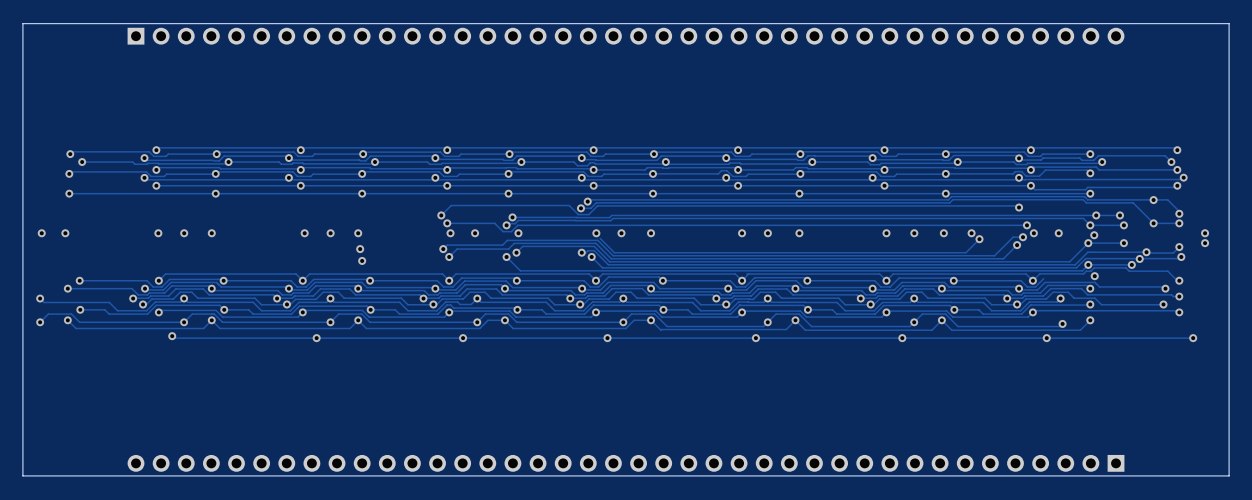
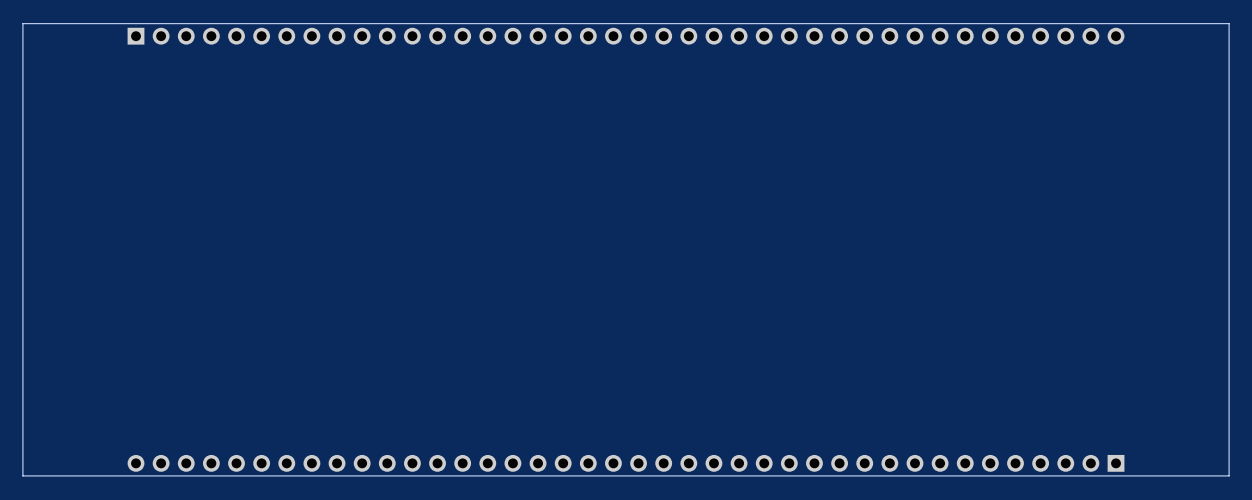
via: (156, 150) -> none
via: (300, 150) -> none
via: (447, 150) -> none
via: (593, 150) -> none
via: (738, 150) -> none
via: (884, 150) -> none
via: (1030, 150) -> none
track: (1177, 150) (1175, 147) (1033, 147) (1030, 150) (1028, 147) (886, 147) (884, 150) (882, 147) (740, 147) (738, 150) (735, 147) (595, 147) (593, 150) (591, 147) (449, 147) (447, 150) (444, 147) (303, 147) (300, 150) (298, 147) (158, 147) (156, 150) -> none
via: (1177, 150) -> none
track: (219, 152) (293, 152) (298, 156) (312, 156) (314, 154) (362, 154) -> none
track: (366, 152) (440, 152) (444, 156) (458, 156) (461, 154) (508, 154) -> none
track: (510, 152) (586, 152) (591, 156) (603, 156) (605, 154) (653, 154) -> none
track: (656, 152) (731, 152) (735, 156) (749, 156) (751, 154) (799, 154) -> none
via: (70, 154) -> none
track: (215, 154) (168, 154) (165, 156) (153, 156) (149, 151) (72, 151) (70, 154) -> none
via: (216, 154) -> none
via: (363, 154) -> none
via: (509, 154) -> none
via: (653, 154) -> none
via: (800, 154) -> none
via: (945, 154) -> none
track: (1090, 154) (1042, 154) (1040, 156) (1028, 156) (1024, 152) (947, 152) (945, 154) (898, 154) (896, 156) (881, 156) (877, 151) (802, 151) (800, 154) -> none
via: (1090, 154) -> none
track: (286, 156) (224, 156) (219, 160) (213, 160) -> none
track: (432, 156) (370, 156) (365, 160) (360, 160) -> none
track: (579, 156) (516, 156) (512, 160) (435, 158) -> none
track: (723, 156) (661, 156) (657, 160) (596, 160) (581, 158) -> none
track: (870, 156) (808, 155) (803, 160) (726, 158) -> none
via: (144, 158) -> none
via: (288, 158) -> none
via: (435, 158) -> none
via: (581, 158) -> none
via: (726, 158) -> none
via: (872, 158) -> none
track: (1019, 158) (1016, 155) (953, 155) (948, 160) (874, 159) -> none
via: (1019, 158) -> none
track: (522, 159) (524, 162) (573, 162) (577, 165) (587, 165) (590, 162) (811, 163) -> none
track: (213, 160) (145, 160) -> none
track: (359, 160) (291, 160) -> none
track: (1021, 160) (1079, 158) (1082, 160) (1093, 160) (1098, 155) (1165, 155) (1171, 162) -> none
track: (814, 161) (867, 162) (870, 164) (957, 162) (1013, 162) (1016, 164) (1102, 162) -> none
via: (82, 162) -> none
via: (228, 162) -> none
via: (375, 162) -> none
track: (521, 162) (441, 164) (429, 164) (427, 162) (291, 164) (281, 164) (279, 162) (147, 164) (134, 164) (132, 162) (82, 162) -> none
via: (521, 162) -> none
via: (665, 162) -> none
via: (812, 162) -> none
via: (957, 162) -> none
via: (1102, 162) -> none
via: (1171, 162) -> none
track: (447, 168) (303, 167) (300, 169) (158, 167) (156, 169) -> none
track: (593, 168) (449, 167) (447, 169) -> none
track: (738, 168) (647, 167) (645, 169) (593, 169) -> none
track: (884, 168) (795, 167) (793, 169) (738, 169) -> none
via: (156, 169) -> none
via: (300, 169) -> none
via: (447, 169) -> none
via: (593, 169) -> none
via: (738, 169) -> none
via: (884, 169) -> none
via: (1030, 169) -> none
track: (1175, 169) (1099, 169) (1096, 167) (1033, 167) (1030, 169) (1029, 168) (886, 167) (884, 169) -> none
via: (1177, 169) -> none
track: (72, 171) (146, 171) (151, 176) (164, 176) (166, 174) (214, 174) -> none
track: (219, 171) (292, 171) (297, 176) (310, 176) (313, 174) (361, 174) -> none
track: (365, 171) (439, 171) (443, 176) (457, 176) (459, 174) (507, 174) -> none
track: (510, 171) (583, 171) (588, 176) (601, 176) (603, 174) (651, 174) -> none
track: (803, 171) (876, 171) (881, 176) (894, 176) (896, 174) (944, 174) -> none
via: (69, 173) -> none
via: (215, 173) -> none
via: (362, 173) -> none
via: (508, 173) -> none
track: (653, 173) (718, 173) (721, 170) (726, 170) (732, 176) (746, 176) (748, 174) (796, 174) -> none
via: (653, 173) -> none
via: (800, 173) -> none
via: (945, 173) -> none
track: (1090, 173) (1087, 170) (1045, 170) (1039, 176) (1026, 176) (1021, 171) (1015, 171) (1013, 173) (945, 173) -> none
via: (1090, 173) -> none
via: (144, 177) -> none
track: (288, 177) (286, 179) (145, 179) -> none
via: (288, 177) -> none
track: (435, 177) (433, 179) (292, 179) -> none
via: (435, 177) -> none
track: (581, 177) (579, 179) (438, 179) -> none
via: (581, 177) -> none
track: (726, 177) (724, 179) (583, 179) -> none
via: (726, 177) -> none
track: (872, 177) (870, 179) (729, 179) -> none
via: (872, 177) -> none
via: (1019, 177) -> none
track: (1183, 177) (1181, 179) (1021, 179) (1019, 177) (1017, 179) (876, 179) -> none
via: (1183, 177) -> none
via: (156, 185) -> none
via: (300, 185) -> none
via: (447, 185) -> none
via: (593, 185) -> none
via: (738, 185) -> none
via: (884, 185) -> none
via: (1030, 185) -> none
track: (1175, 185) (1173, 187) (1087, 187) (1085, 189) (1034, 189) (1030, 185) (156, 185) -> none
via: (1177, 185) -> none
via: (69, 193) -> none
via: (215, 193) -> none
via: (362, 193) -> none
via: (508, 193) -> none
via: (653, 193) -> none
via: (799, 193) -> none
via: (945, 193) -> none
track: (1090, 193) (69, 193) -> none
via: (1090, 193) -> none
via: (1153, 200) -> none
track: (587, 201) (589, 199) (948, 199) (951, 196) (1084, 196) (1087, 199) (1167, 199) (1179, 213) -> none
via: (587, 201) -> none
track: (1019, 207) (1017, 205) (597, 205) (588, 214) (578, 214) (569, 205) (451, 205) (441, 215) -> none
via: (1019, 207) -> none
track: (580, 208) (590, 208) (596, 202) (949, 202) (952, 199) (1083, 199) (1086, 202) (1133, 202) (1153, 223) (1179, 223) -> none
via: (580, 208) -> none
via: (1179, 213) -> none
via: (441, 215) -> none
via: (1096, 215) -> none
track: (1119, 215) (611, 215) (609, 217) (512, 217) -> none
via: (1119, 215) -> none
via: (512, 217) -> none
track: (447, 223) (494, 223) (502, 231) (511, 231) (517, 225) (1026, 225) -> none
via: (447, 223) -> none
via: (1153, 223) -> none
via: (1179, 223) -> none
via: (506, 225) -> none
via: (1026, 225) -> none
via: (1090, 225) -> none
track: (1123, 225) (1090, 225) (1083, 218) (613, 218) (610, 220) (518, 220) (515, 223) (509, 222) (506, 225) -> none
via: (1123, 225) -> none
via: (41, 233) -> none
via: (65, 233) -> none
via: (158, 233) -> none
via: (184, 233) -> none
via: (211, 233) -> none
via: (304, 233) -> none
via: (330, 233) -> none
via: (358, 233) -> none
via: (450, 233) -> none
via: (475, 233) -> none
via: (518, 233) -> none
via: (596, 233) -> none
via: (621, 233) -> none
via: (651, 233) -> none
via: (742, 233) -> none
via: (767, 233) -> none
via: (799, 233) -> none
via: (886, 233) -> none
via: (914, 233) -> none
via: (943, 233) -> none
via: (971, 233) -> none
via: (1033, 233) -> none
via: (1058, 233) -> none
via: (1205, 233) -> none
via: (1094, 235) -> none
track: (1023, 237) (1013, 237) (994, 255) (613, 255) (597, 240) (507, 240) (502, 245) (447, 245) (443, 249) -> none
via: (1023, 237) -> none
track: (600, 238) (614, 252) (965, 252) (979, 239) -> none
via: (979, 239) -> none
via: (1088, 243) -> none
track: (1123, 243) (1088, 243) (1069, 261) (609, 261) (594, 246) (522, 246) (516, 252) -> none
via: (1123, 243) -> none
via: (1205, 243) -> none
track: (1017, 245) (1003, 258) (611, 258) (595, 243) (514, 243) (508, 249) (457, 249) (449, 256) -> none
via: (1017, 245) -> none
track: (1179, 247) (1173, 253) (1087, 252) (1075, 264) (608, 264) (594, 250) (581, 252) -> none
via: (1179, 247) -> none
via: (360, 249) -> none
via: (443, 249) -> none
via: (516, 252) -> none
via: (581, 252) -> none
via: (1146, 252) -> none
via: (449, 256) -> none
track: (506, 256) (520, 270) (1082, 270) (1088, 264) (1131, 264) -> none
via: (506, 256) -> none
via: (591, 256) -> none
track: (1181, 256) (1179, 258) (1085, 258) (1076, 267) (602, 267) (591, 256) -> none
via: (1181, 256) -> none
via: (1139, 258) -> none
via: (362, 260) -> none
via: (1088, 264) -> none
via: (1131, 264) -> none
track: (455, 274) (449, 280) (442, 274) (309, 274) (302, 280) (296, 274) (165, 274) (158, 280) -> none
track: (746, 274) (879, 274) (886, 280) (893, 274) (1026, 274) (1032, 280) (1039, 273) (1083, 273) (1094, 267) (1125, 267) (1129, 271) (1167, 271) (1177, 280) -> none
track: (748, 274) (742, 280) (735, 274) (602, 274) (595, 280) (589, 274) (456, 274) -> none
via: (1094, 276) -> none
track: (77, 278) (79, 280) (146, 280) (153, 286) (162, 286) (169, 279) (222, 279) -> none
track: (221, 278) (223, 280) (290, 280) (297, 286) (306, 286) (313, 279) (368, 279) -> none
track: (1043, 278) (1035, 286) (1027, 286) (1021, 280) (953, 280) (951, 278) (899, 278) (890, 286) (880, 286) (874, 280) (807, 280) (804, 277) (754, 277) (745, 286) (736, 286) (730, 280) (662, 280) (659, 277) (608, 277) (598, 286) (590, 286) (584, 280) (516, 280) (514, 278) (461, 278) (452, 286) (443, 286) (437, 280) (370, 280) (368, 278) -> none
via: (79, 280) -> none
via: (158, 280) -> none
via: (223, 280) -> none
via: (302, 280) -> none
via: (370, 280) -> none
via: (449, 280) -> none
via: (516, 280) -> none
via: (595, 280) -> none
via: (662, 280) -> none
via: (742, 280) -> none
via: (807, 280) -> none
via: (886, 280) -> none
via: (953, 280) -> none
via: (1032, 280) -> none
via: (1179, 280) -> none
track: (285, 287) (221, 286) (216, 282) (171, 282) (163, 289) (145, 288) -> none
track: (578, 287) (512, 287) (506, 281) (464, 281) (455, 289) (436, 289) (434, 287) (367, 287) (361, 282) (314, 282) (307, 289) (288, 288) -> none
track: (67, 288) (132, 288) (138, 294) (147, 294) (149, 292) (164, 292) (171, 285) (209, 285) (213, 290) (277, 290) (282, 294) (291, 294) (293, 292) (308, 292) (315, 285) (355, 285) (360, 290) (424, 290) (428, 294) (437, 294) (439, 292) (457, 292) (465, 284) (501, 284) (506, 290) (571, 290) (575, 294) (603, 292) -> none
via: (67, 288) -> none
via: (145, 288) -> none
via: (211, 288) -> none
via: (288, 288) -> none
via: (358, 288) -> none
via: (435, 288) -> none
via: (504, 288) -> none
via: (582, 288) -> none
via: (651, 288) -> none
via: (728, 288) -> none
via: (795, 288) -> none
track: (872, 288) (803, 287) (796, 280) (755, 280) (746, 289) (659, 288) (653, 282) (608, 282) (600, 289) (582, 288) -> none
via: (872, 288) -> none
via: (941, 288) -> none
via: (1019, 288) -> none
track: (1090, 288) (1087, 285) (1047, 285) (1040, 292) (1012, 294) (1008, 290) (943, 290) (939, 285) (902, 285) (895, 292) (865, 294) (861, 290) (797, 290) (792, 285) (756, 285) (749, 292) (721, 294) (718, 291) (654, 291) (647, 285) (610, 285) (603, 292) -> none
via: (1090, 288) -> none
track: (1163, 288) (1161, 286) (1099, 286) (1095, 282) (1045, 282) (1037, 289) (1020, 289) (1017, 286) (948, 286) (944, 282) (901, 282) (894, 289) (873, 289) -> none
via: (1165, 288) -> none
track: (1179, 296) (1171, 294) (1087, 294) (1081, 288) (1050, 288) (1043, 296) (1007, 298) -> none
via: (1179, 296) -> none
via: (40, 298) -> none
track: (133, 298) (168, 296) (175, 289) (203, 289) (209, 294) (273, 294) (277, 298) (313, 296) (320, 289) (349, 289) (355, 294) (419, 294) (423, 298) -> none
via: (133, 298) -> none
via: (184, 298) -> none
via: (277, 298) -> none
via: (330, 298) -> none
track: (423, 298) (460, 296) (467, 289) (496, 289) (502, 294) (566, 294) (570, 298) -> none
via: (423, 298) -> none
via: (477, 298) -> none
track: (570, 298) (604, 296) (612, 288) (642, 288) (648, 294) (712, 294) (716, 298) (750, 296) (758, 289) (787, 289) (792, 294) (857, 294) (860, 298) (897, 296) (904, 289) (933, 289) (939, 294) (1003, 294) (1007, 298) -> none
via: (570, 298) -> none
via: (623, 298) -> none
via: (716, 298) -> none
via: (767, 298) -> none
via: (860, 298) -> none
via: (914, 298) -> none
via: (1007, 298) -> none
track: (1060, 298) (1057, 302) (1029, 302) (1020, 310) (991, 310) (983, 302) (917, 302) (914, 298) (910, 302) (882, 302) (874, 310) (845, 310) (837, 302) (771, 302) (767, 298) (763, 302) (738, 302) (729, 310) (700, 310) (692, 302) (627, 302) (623, 298) (619, 302) (592, 302) (583, 310) (554, 310) (546, 302) (481, 302) (477, 298) (471, 304) (445, 302) (437, 310) (408, 310) (399, 302) (334, 302) (330, 298) (326, 302) (298, 302) (290, 310) (261, 310) (253, 302) (187, 302) (184, 298) (180, 302) (155, 302) (146, 310) (117, 310) (109, 302) (44, 302) (40, 298) -> none
via: (1060, 298) -> none
track: (1161, 302) (1163, 304) (1101, 304) (1095, 298) (1074, 298) (1068, 292) (1053, 292) (1046, 299) (1026, 299) (1020, 304) (991, 304) (985, 298) (927, 298) (922, 292) (906, 292) (899, 299) (879, 299) (874, 304) (845, 304) (838, 298) (781, 298) (775, 292) (760, 292) (753, 299) (735, 299) (729, 304) (700, 304) (694, 298) (637, 298) (631, 292) (616, 292) (609, 299) (589, 299) (583, 304) (554, 304) (548, 298) (491, 298) (485, 292) (469, 292) (463, 299) (442, 299) (436, 304) (407, 304) (401, 298) (344, 298) (338, 292) (323, 292) (316, 299) (295, 299) (290, 304) (261, 304) (254, 298) (197, 298) (191, 292) (180, 292) (173, 299) (151, 299) (146, 304) (142, 304) -> none
via: (143, 304) -> none
via: (286, 304) -> none
via: (433, 304) -> none
via: (580, 304) -> none
via: (726, 304) -> none
via: (870, 304) -> none
via: (1017, 304) -> none
track: (1090, 304) (1030, 305) (1021, 314) (983, 314) (978, 309) (954, 309) (950, 305) (883, 305) (875, 314) (836, 314) (832, 309) (807, 309) (803, 305) (739, 305) (730, 314) (692, 314) (688, 309) (663, 309) (659, 305) (593, 305) (584, 314) (546, 314) (541, 309) (517, 309) (515, 308) (453, 308) (450, 305) (446, 305) (437, 314) (399, 314) (395, 309) (370, 309) (367, 306) (299, 306) (291, 314) (253, 314) (248, 309) (224, 309) (219, 305) (156, 305) (147, 314) (109, 314) (104, 309) (80, 309) -> none
via: (1090, 304) -> none
via: (1163, 304) -> none
via: (80, 309) -> none
via: (224, 309) -> none
via: (370, 309) -> none
via: (517, 309) -> none
via: (663, 309) -> none
via: (807, 309) -> none
via: (954, 309) -> none
track: (450, 310) (444, 317) (369, 317) (362, 310) (304, 310) (298, 317) (222, 317) (216, 310) (160, 310) (158, 312) -> none
track: (597, 310) (591, 317) (515, 317) (509, 311) (450, 311) -> none
track: (743, 310) (737, 317) (661, 317) (655, 311) (597, 311) -> none
track: (888, 310) (881, 317) (806, 317) (800, 311) (743, 311) -> none
track: (1087, 310) (1034, 310) (1028, 317) (952, 317) (946, 311) (887, 311) -> none
track: (1087, 310) (1175, 310) (1177, 312) -> none
via: (158, 312) -> none
via: (302, 312) -> none
via: (449, 312) -> none
via: (595, 312) -> none
via: (742, 312) -> none
via: (886, 312) -> none
via: (1032, 312) -> none
via: (1179, 312) -> none
via: (67, 320) -> none
via: (211, 320) -> none
via: (358, 320) -> none
via: (504, 320) -> none
via: (651, 320) -> none
via: (795, 320) -> none
via: (941, 320) -> none
track: (1090, 320) (1080, 330) (951, 330) (941, 320) (932, 330) (805, 330) (795, 320) (786, 329) (660, 330) (651, 320) (634, 320) (625, 328) (513, 328) (504, 320) (488, 320) (479, 328) (366, 328) (358, 320) (350, 328) (219, 328) (211, 320) (203, 328) (76, 328) (67, 320) -> none
via: (1090, 320) -> none
track: (40, 322) (48, 314) (71, 314) (79, 322) (184, 322) (192, 314) (214, 314) (222, 322) (330, 322) (338, 314) (361, 314) (370, 322) (477, 322) (485, 314) (508, 314) (516, 322) (623, 322) (631, 314) (654, 314) (667, 326) (763, 326) (775, 314) (799, 314) (811, 326) (909, 326) (922, 314) (945, 314) (958, 326) (1059, 326) (1062, 323) -> none
via: (40, 322) -> none
via: (184, 322) -> none
via: (330, 322) -> none
via: (477, 322) -> none
via: (623, 322) -> none
via: (767, 322) -> none
via: (914, 322) -> none
via: (1062, 323) -> none
track: (172, 336) (174, 338) (1193, 338) -> none
via: (172, 336) -> none
via: (316, 338) -> none
via: (463, 338) -> none
via: (607, 338) -> none
via: (755, 338) -> none
via: (902, 338) -> none
via: (1046, 338) -> none
via: (1193, 338) -> none

